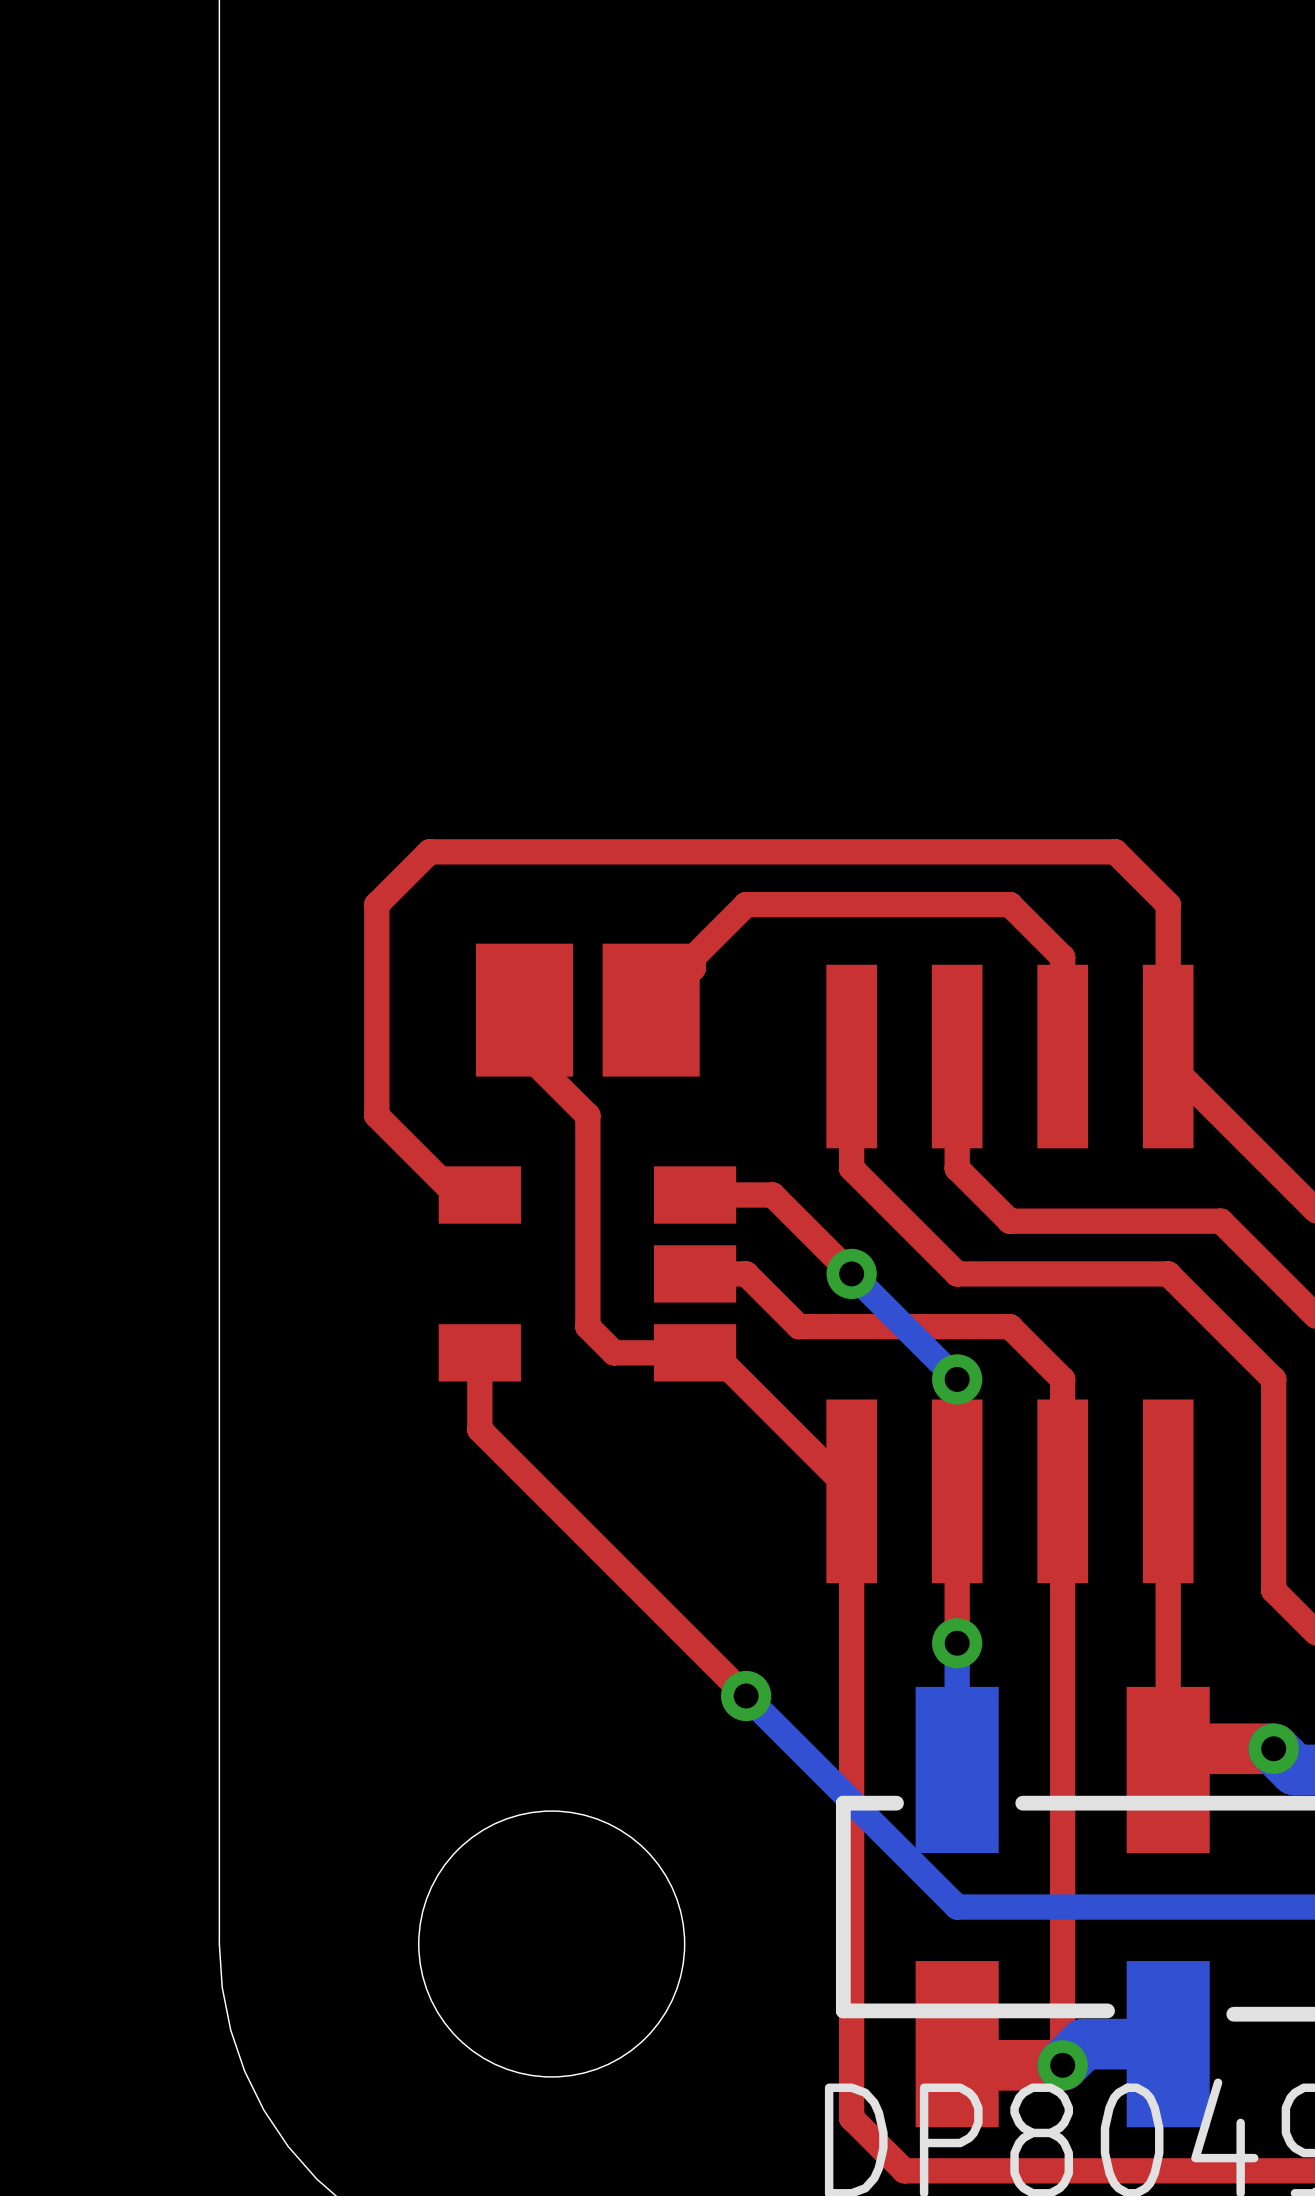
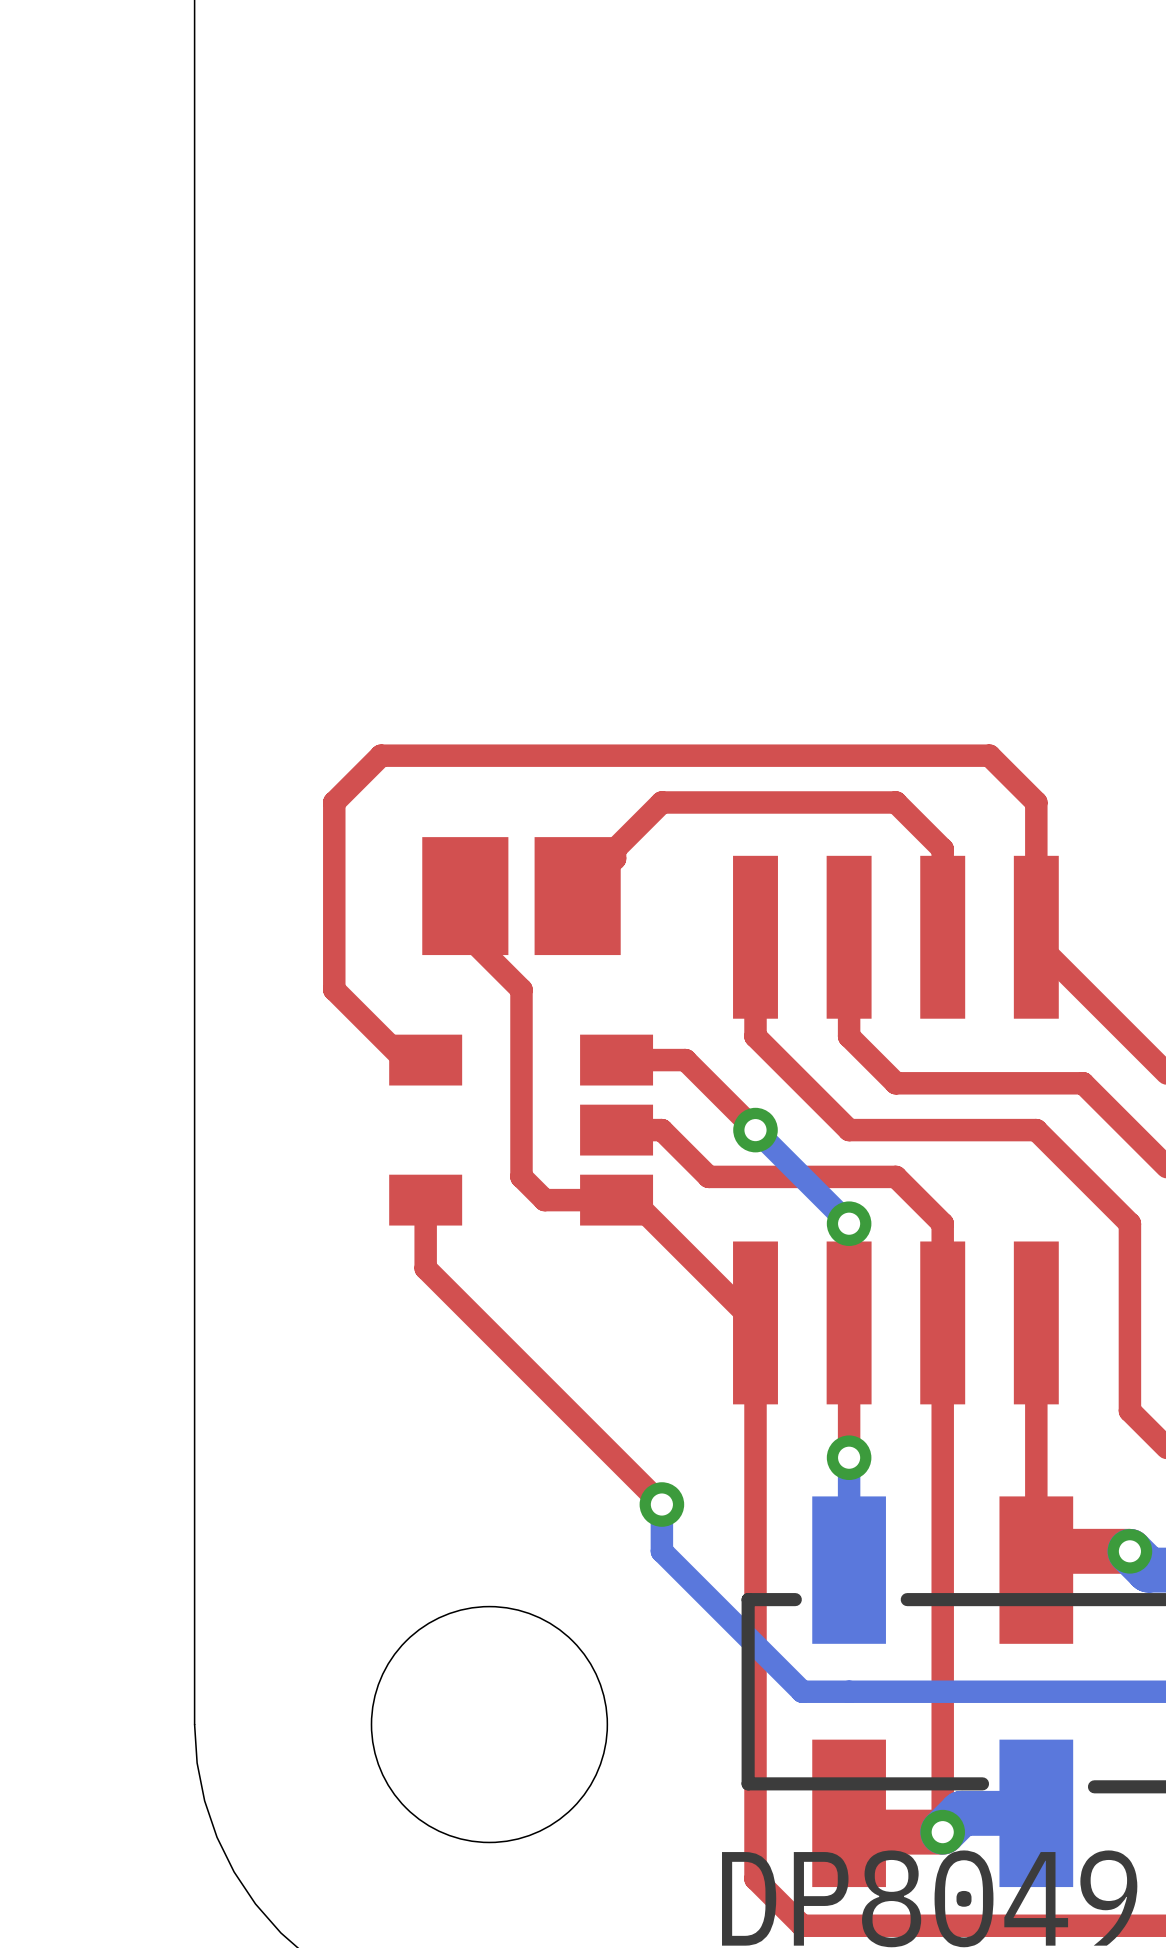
bottom track: (746, 1696) (957, 1907) -> (661, 1504) (661, 1551) (802, 1691) (849, 1691)

